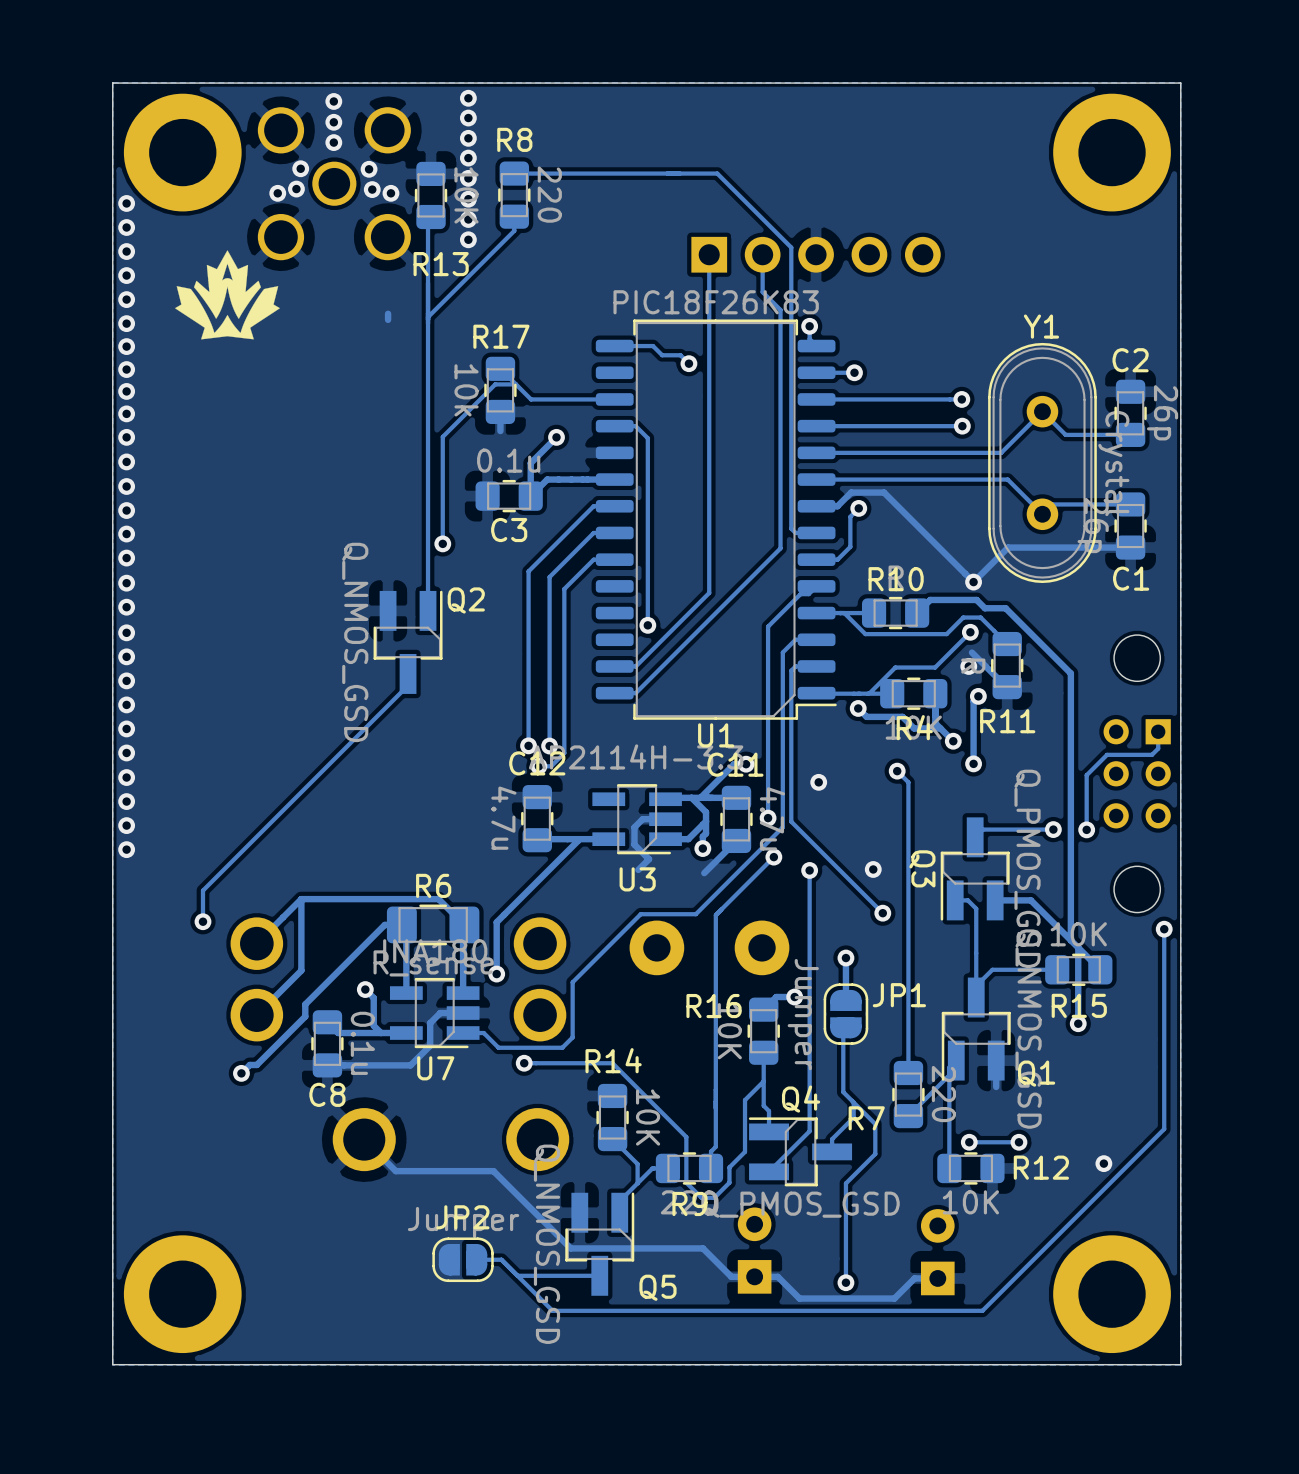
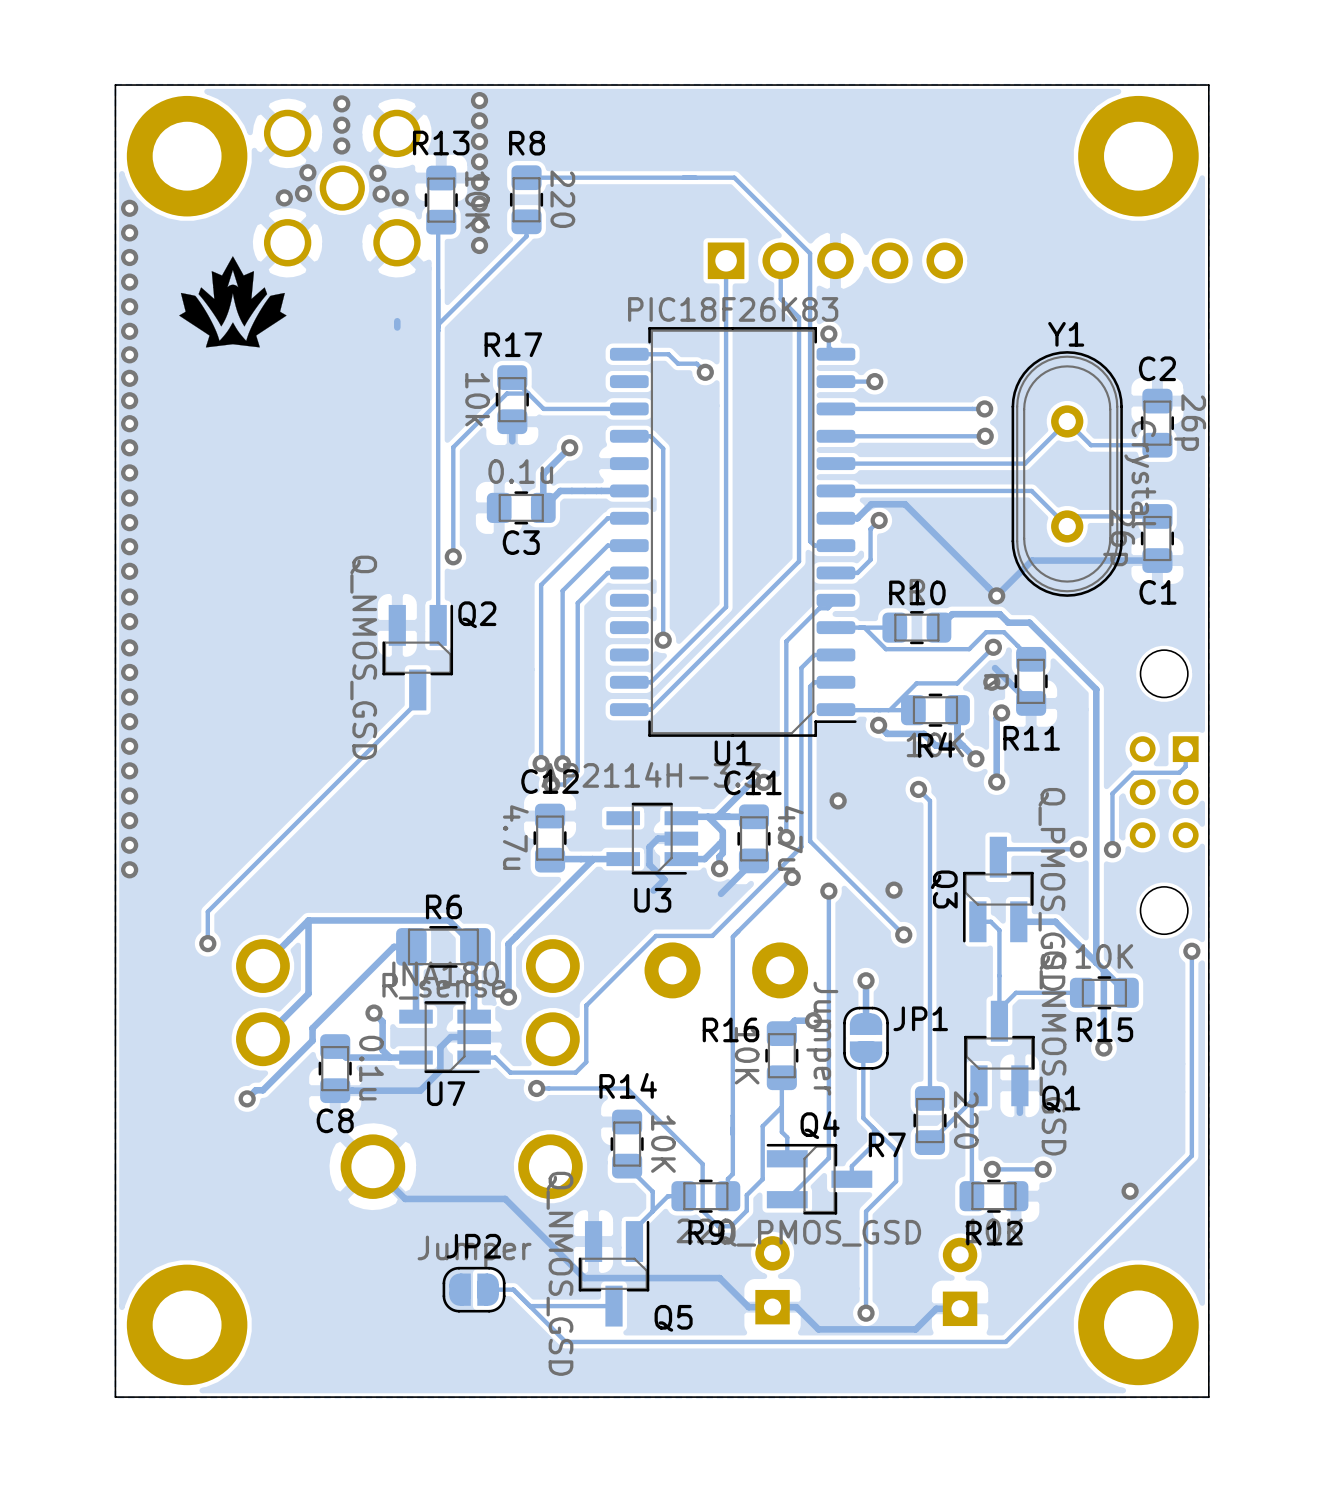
R13 name position: R13 (441, 264) -> R13 (441, 142)
R12 name position: R12 (1041, 1167) -> R12 (994, 1233)

